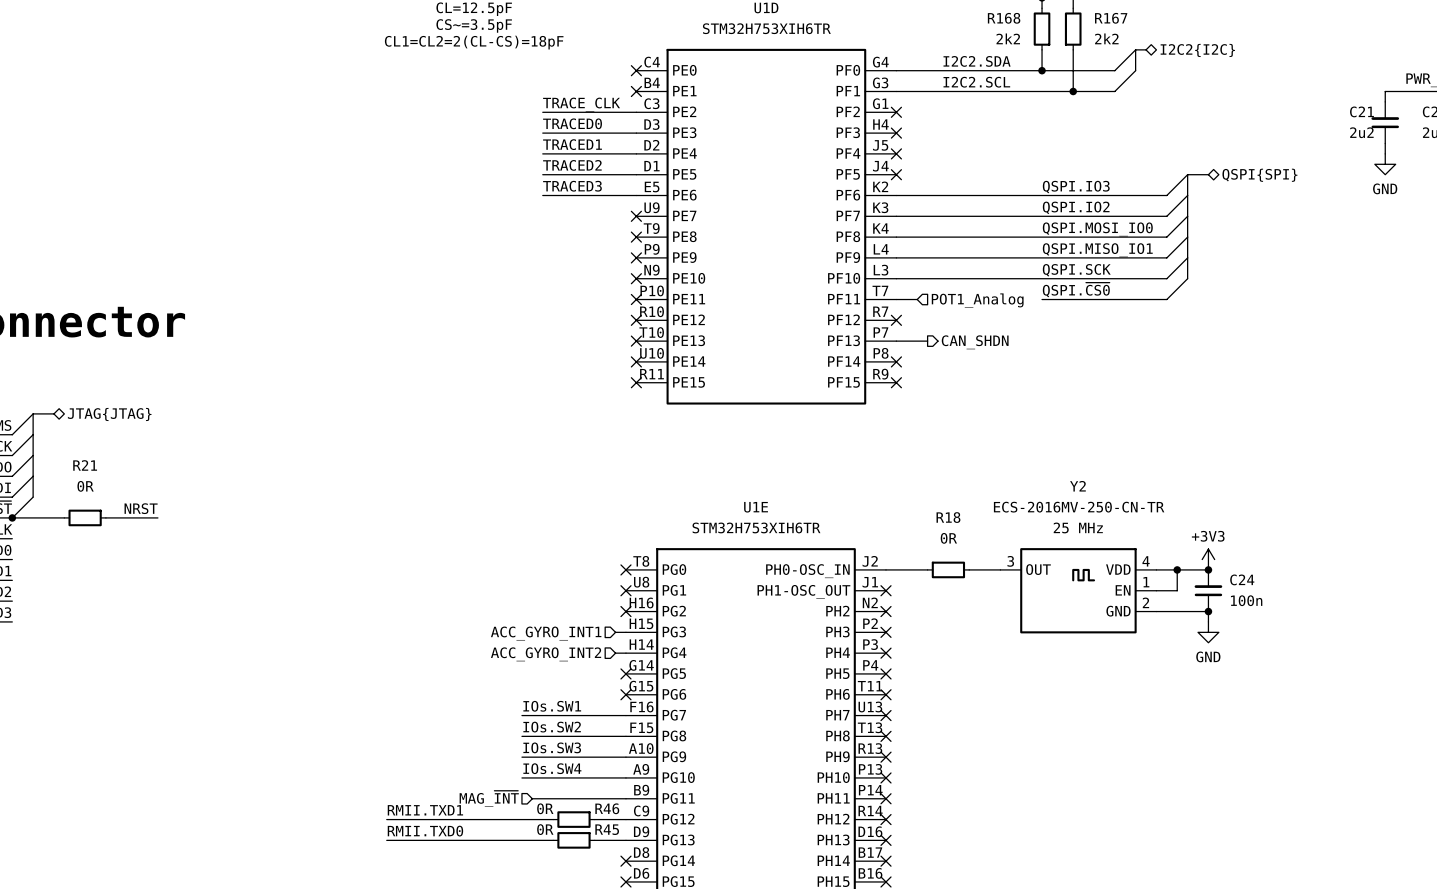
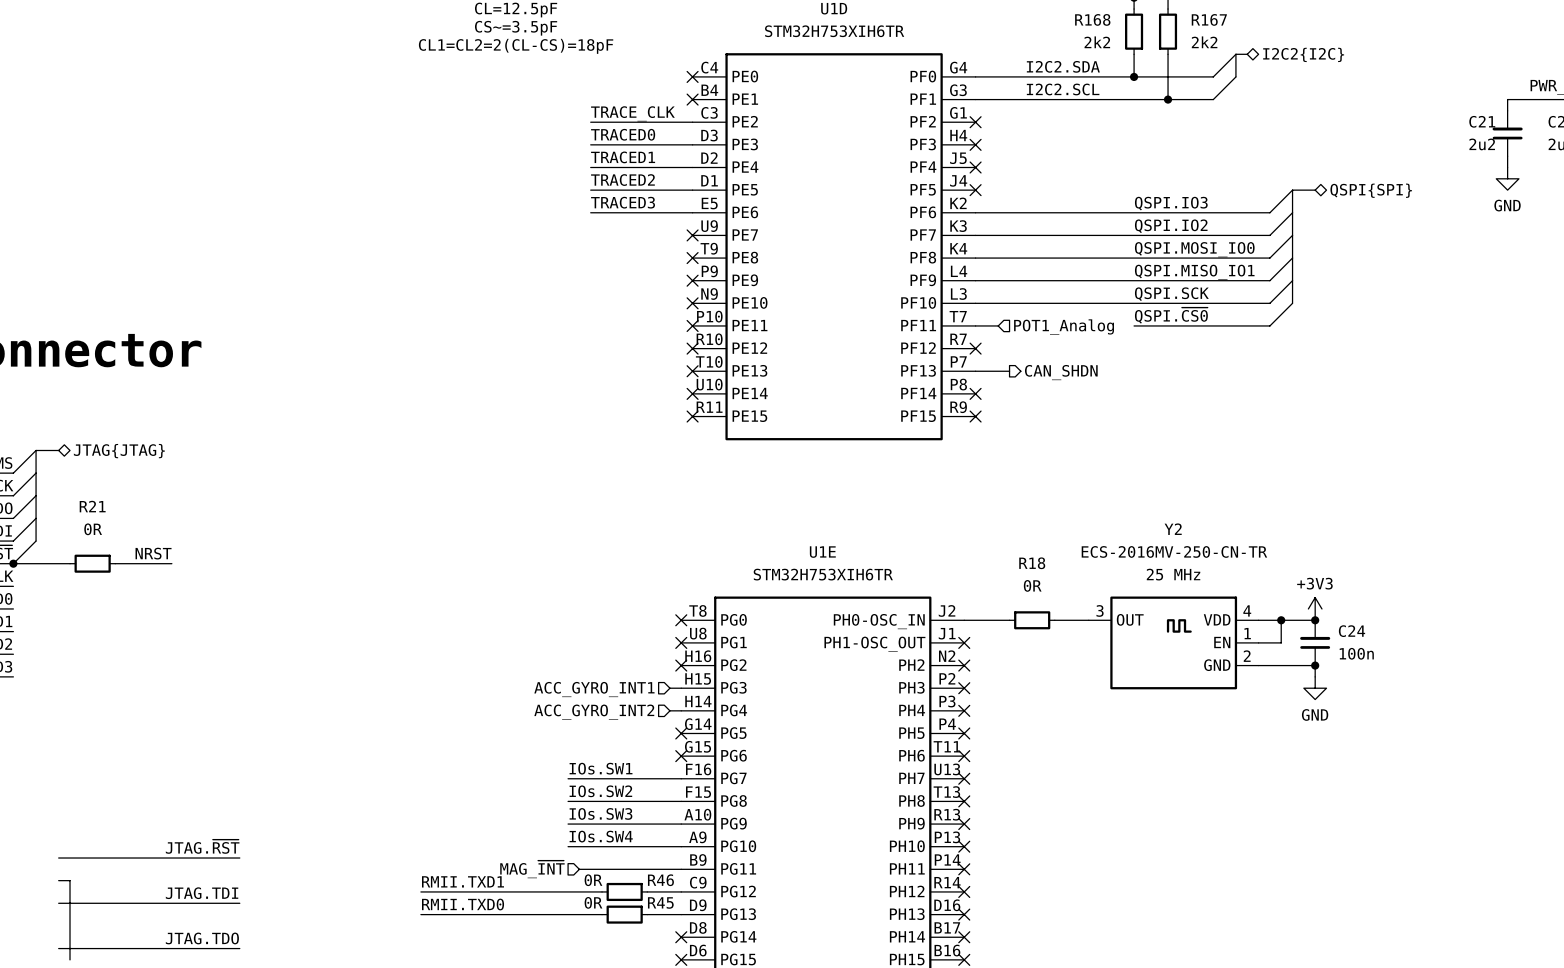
label: none -> JTAG.~{RST} (202, 846)
wire: none -> (58, 858) (239, 858)
wire: none -> (58, 880) (70, 880) (70, 959)
label: none -> JTAG.TDI (202, 893)
wire: none -> (58, 903) (239, 903)
label: none -> JTAG.TDO (202, 938)
wire: none -> (58, 948) (239, 948)

